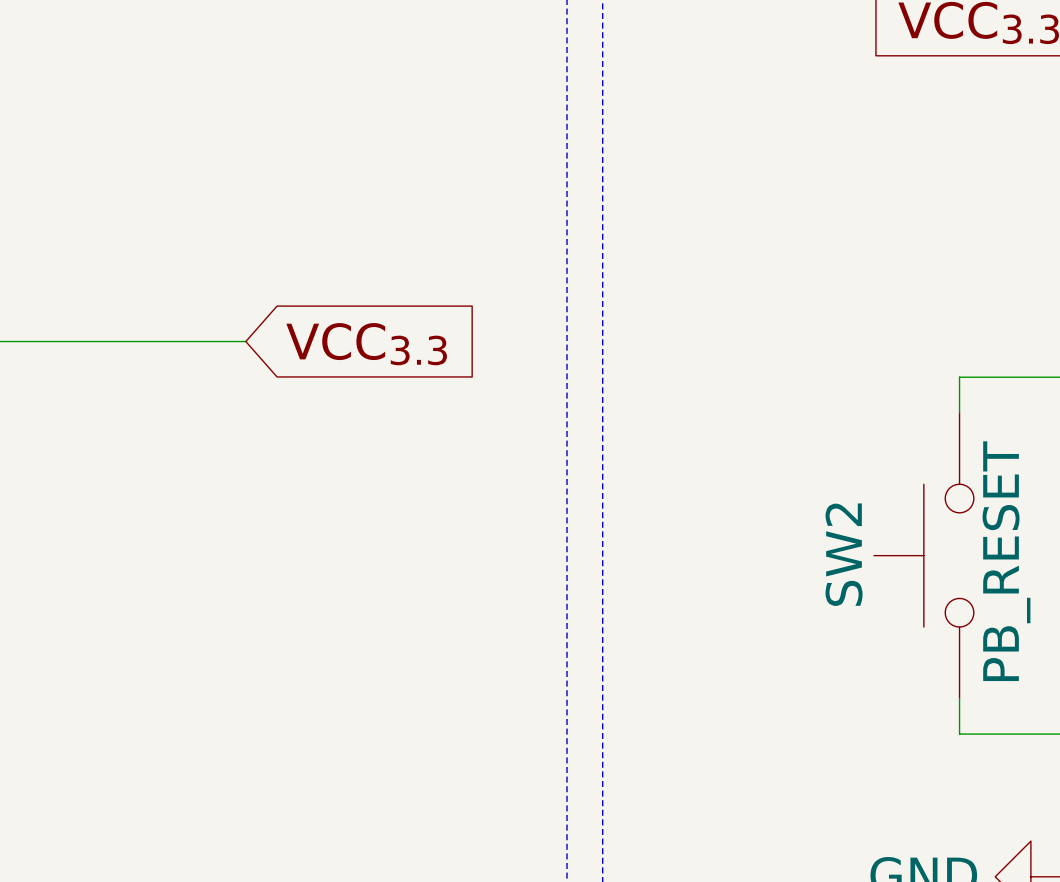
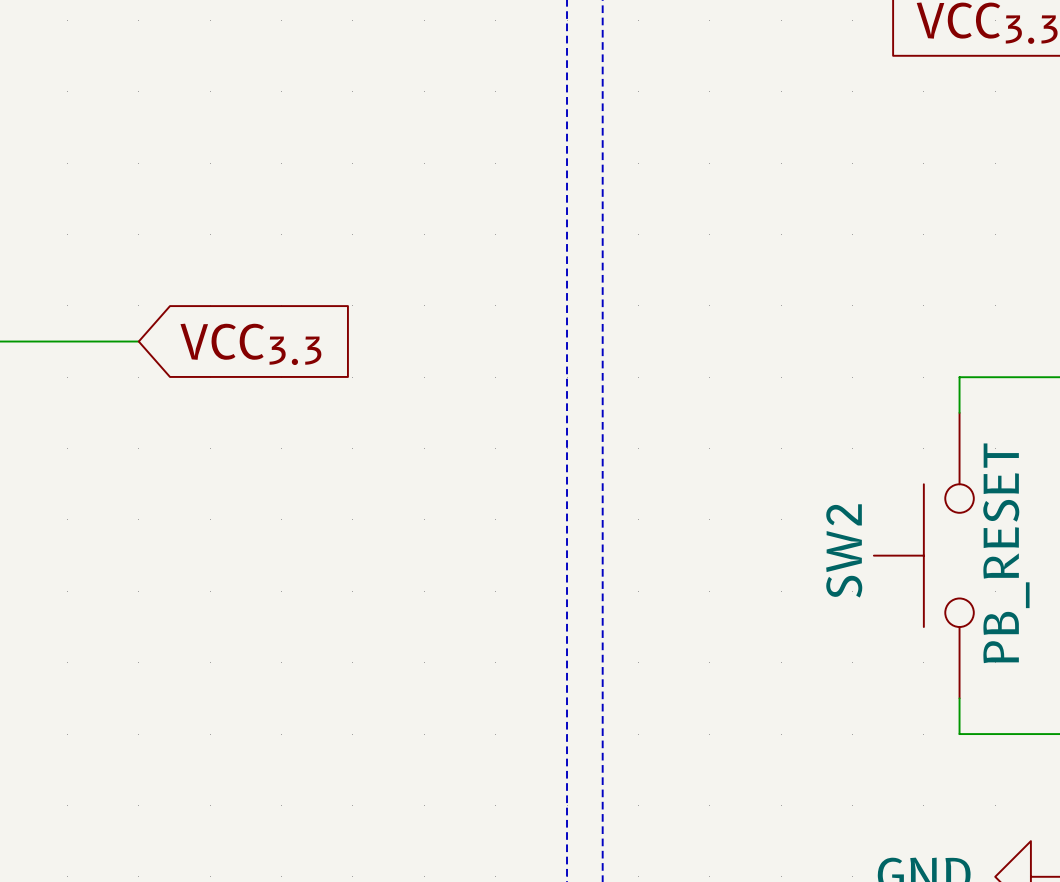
wire: (138, 341) (245, 341) -> none
global label position: VCC3.3 (366, 344) -> VCC3.3 (250, 344)

